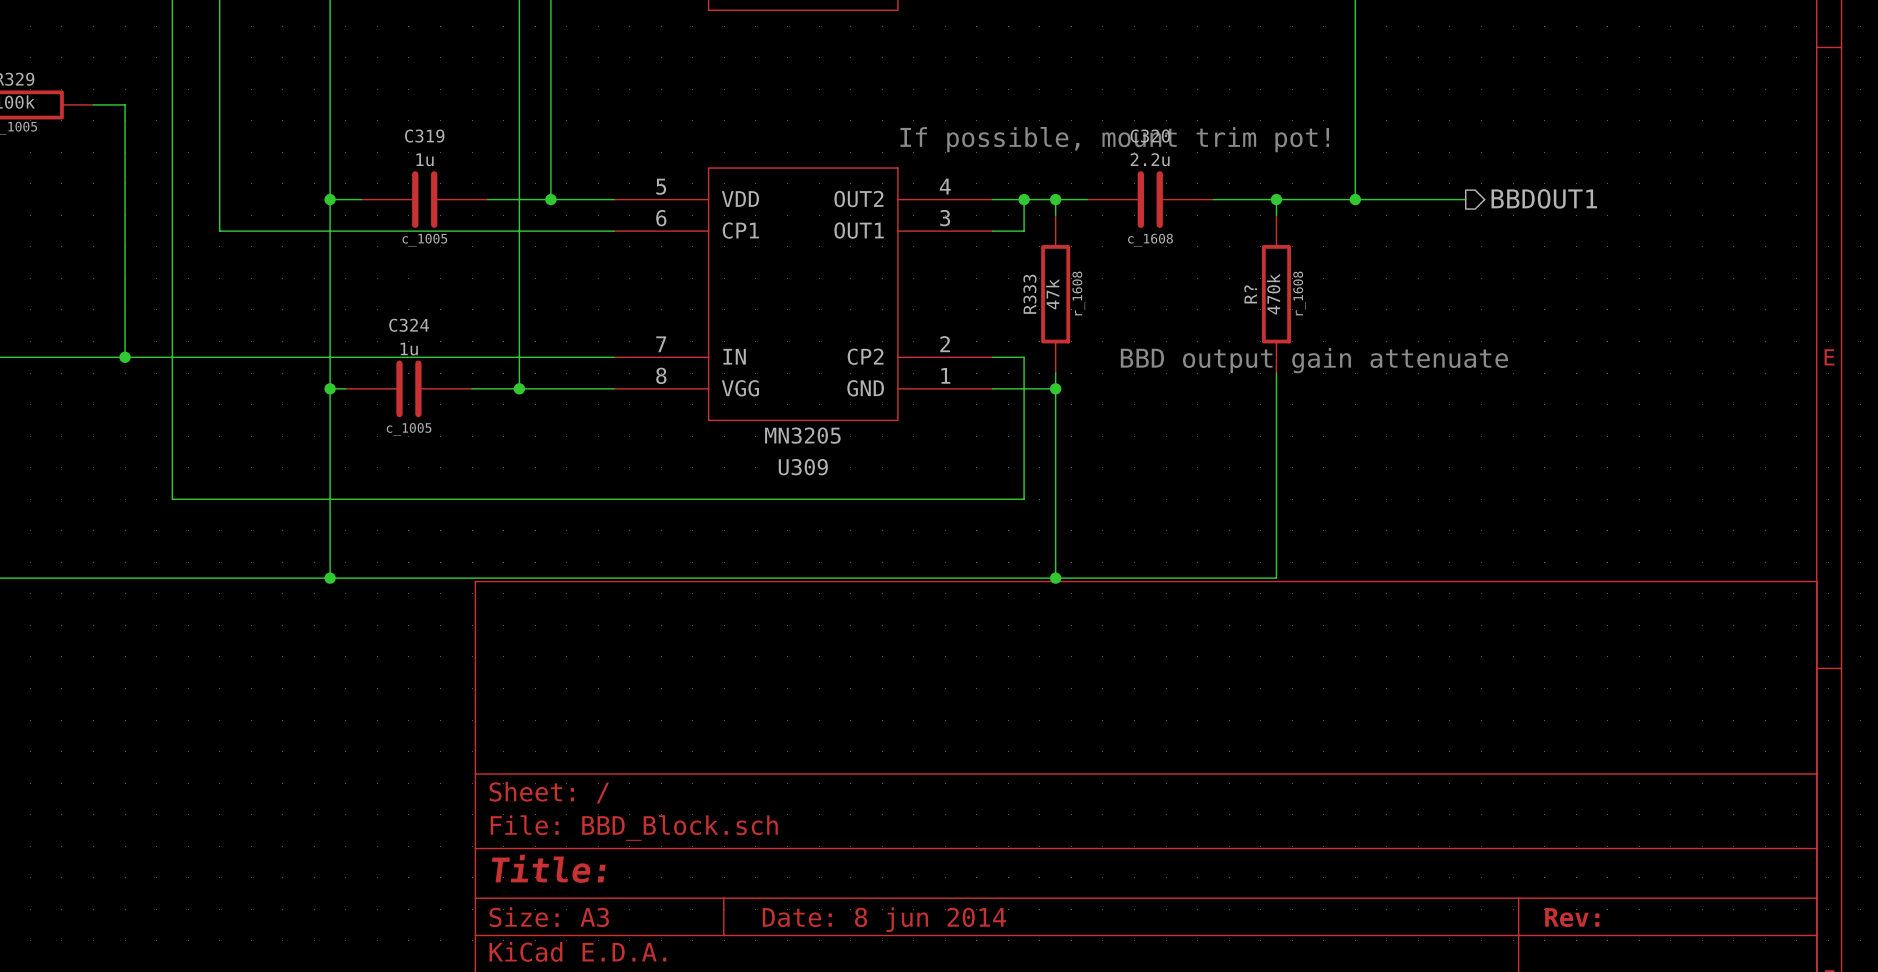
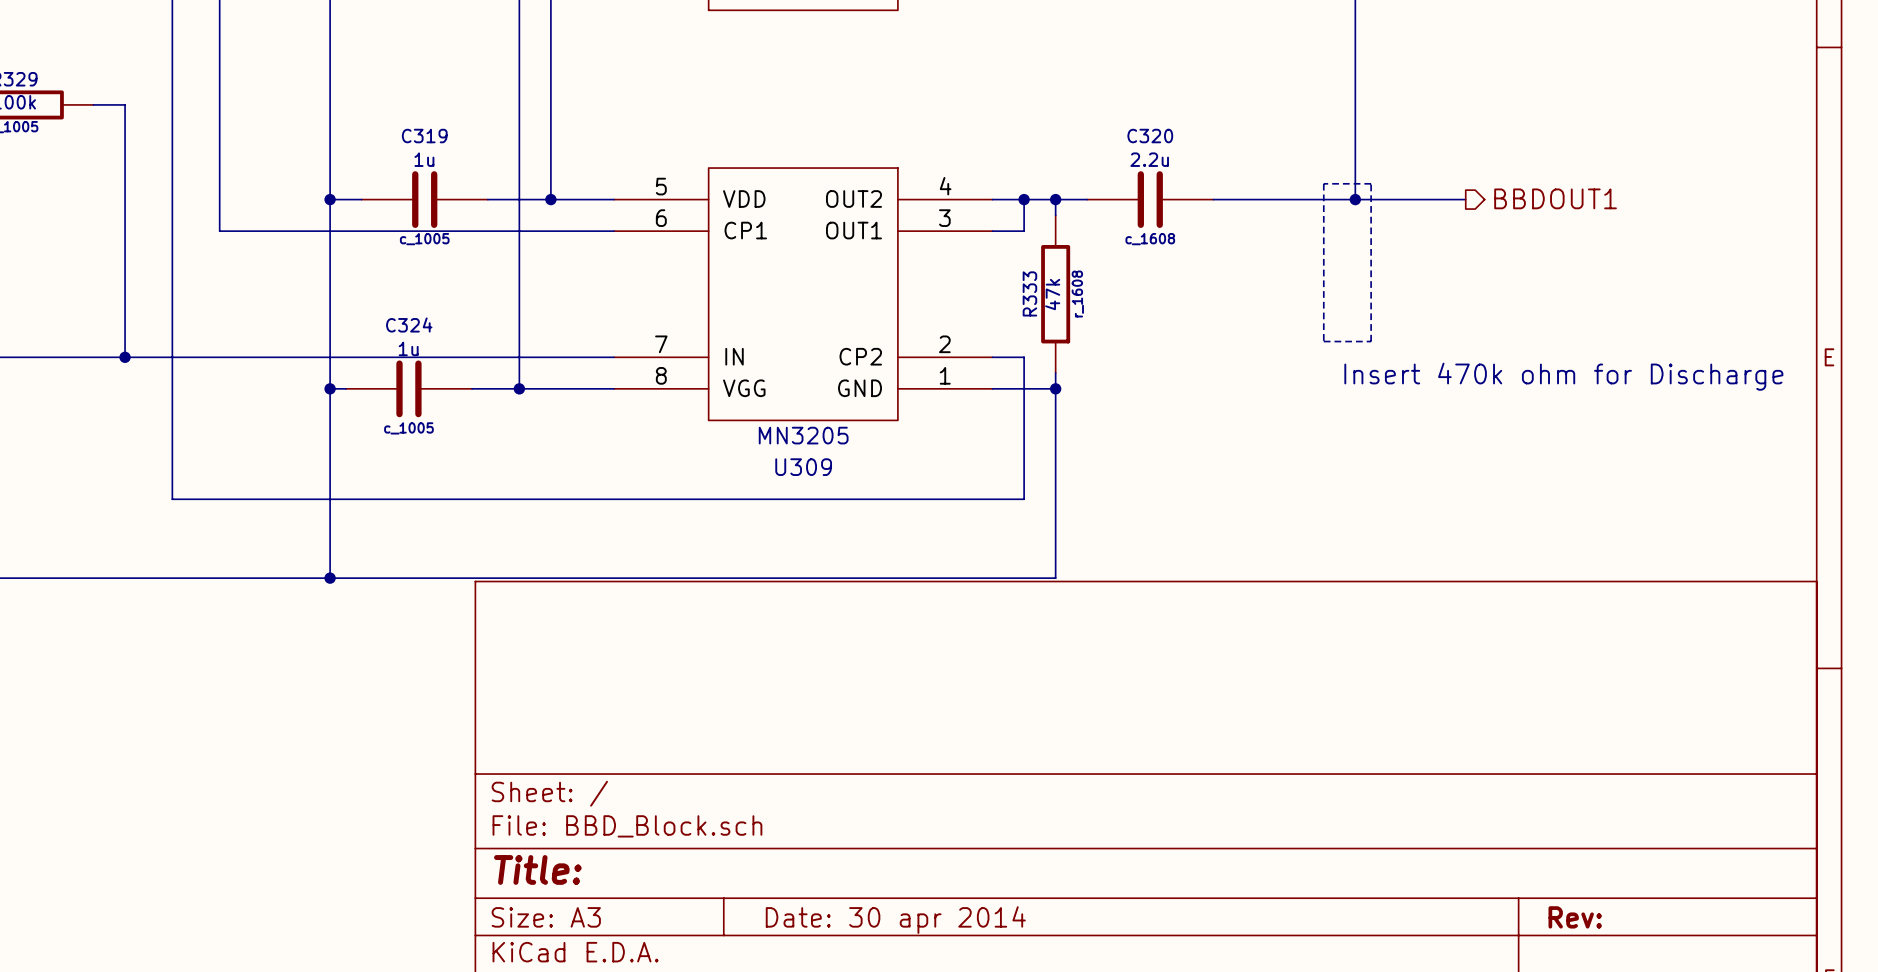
text: If possible, mount trim pot! (1114, 139) -> none
line: none -> (1323, 183) (1323, 341) (1371, 341) (1371, 183) (1323, 183)
wire: (1276, 199) (1276, 215) -> none
junction: (1276, 199) -> none
R?: 470k (1276, 294) -> none
text: BBD output gain attenuate (1314, 360) -> none
wire: (1276, 373) (1276, 578) (1055, 578) -> none
text: none -> Insert 470k ohm for Discharge (1563, 376)
junction: (1055, 578) -> none
title block: Date: 8 jun 2014 (884, 919) -> Date: 30 apr 2014 (895, 920)

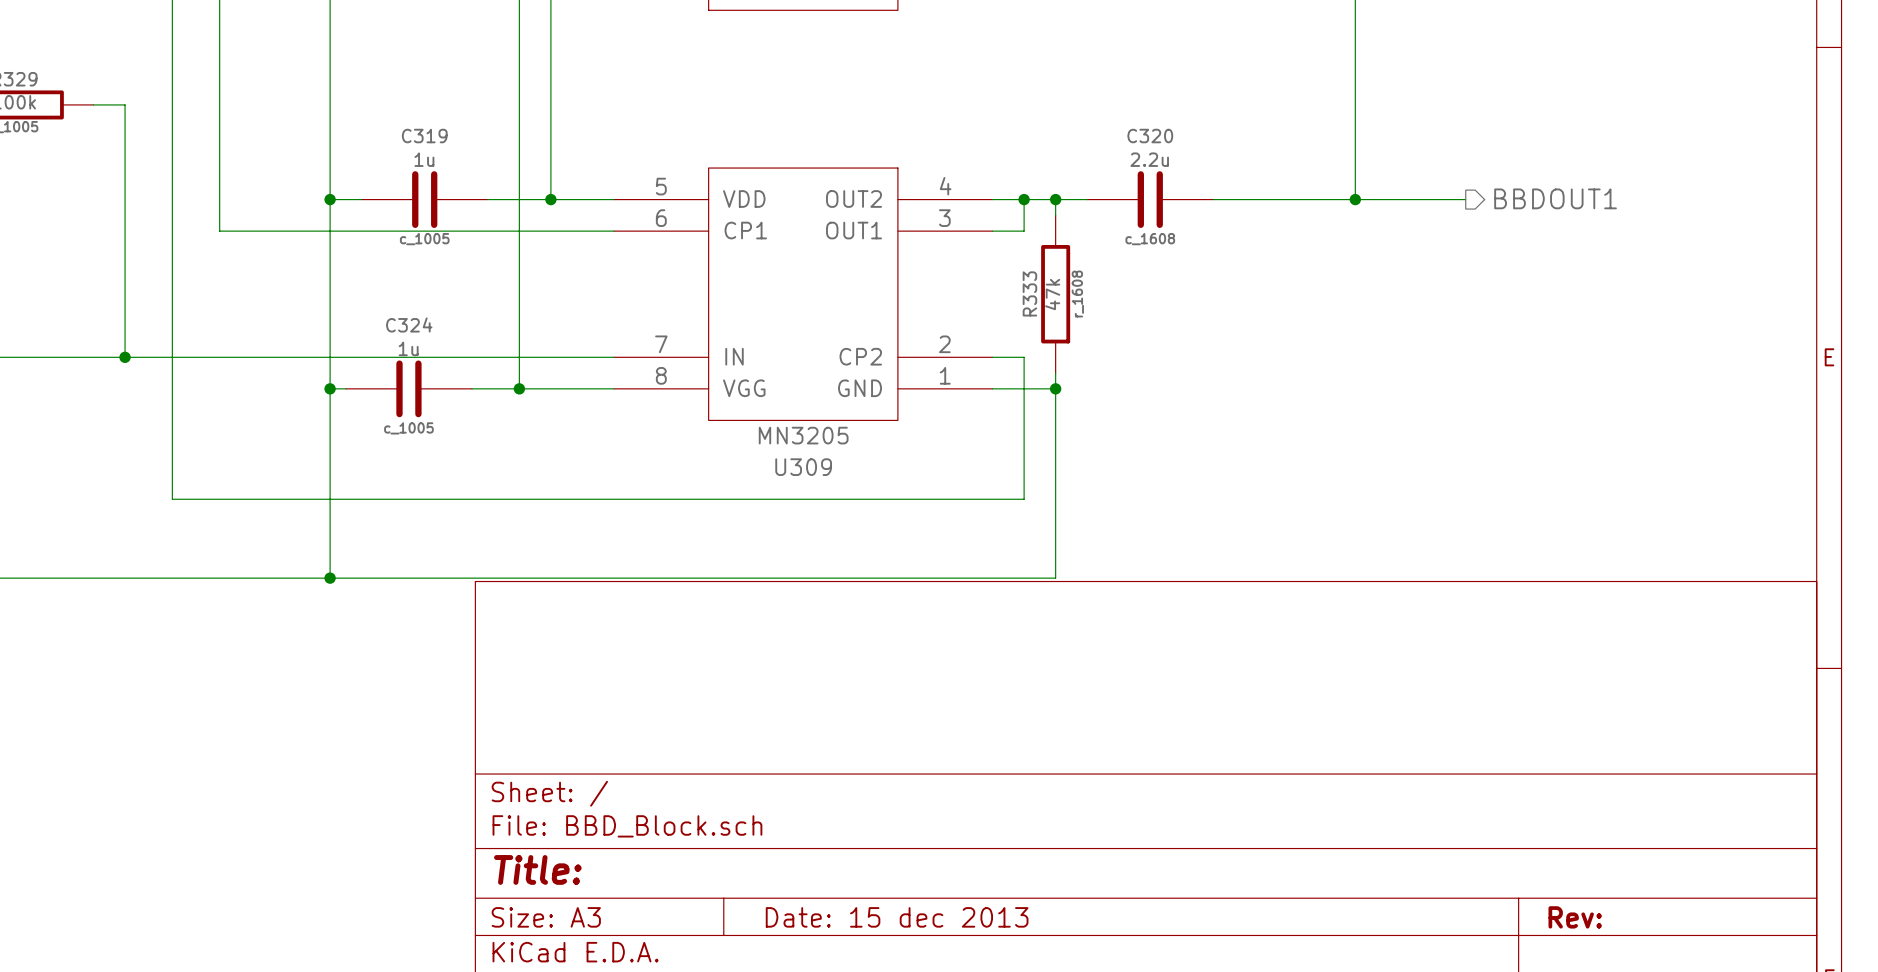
line: (1323, 183) (1323, 341) (1371, 341) (1371, 183) (1323, 183) -> none
text: Insert 470k ohm for Discharge (1563, 376) -> none
title block: Date: 30 apr 2014 (895, 920) -> Date: 15 dec 2013 (897, 917)

